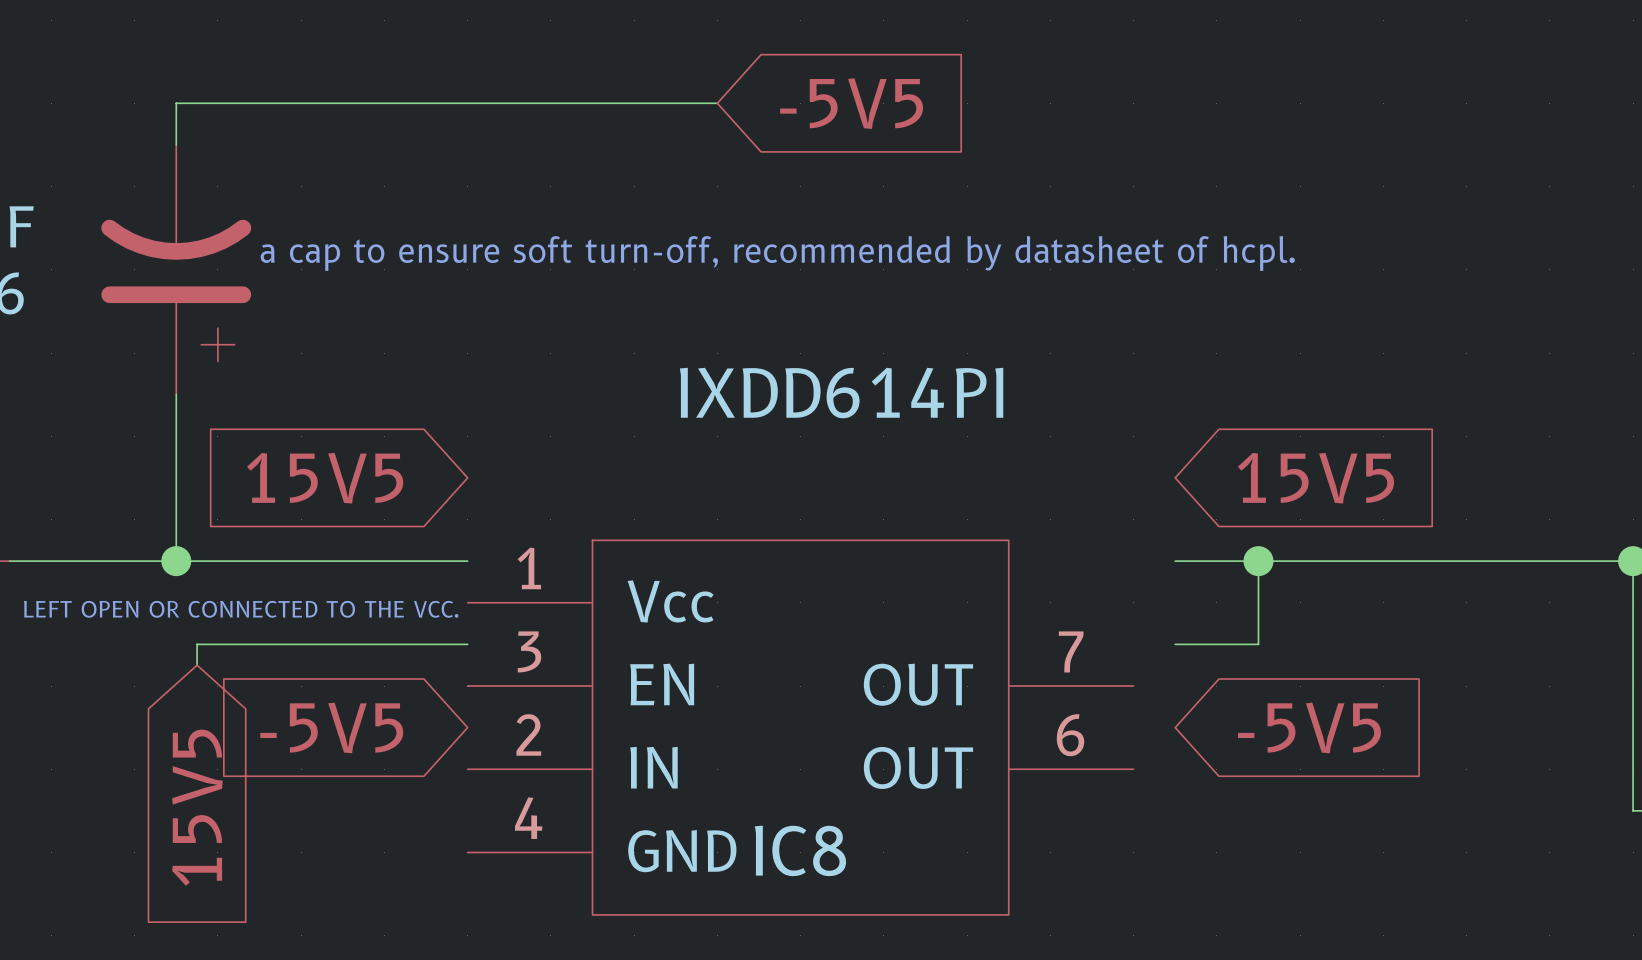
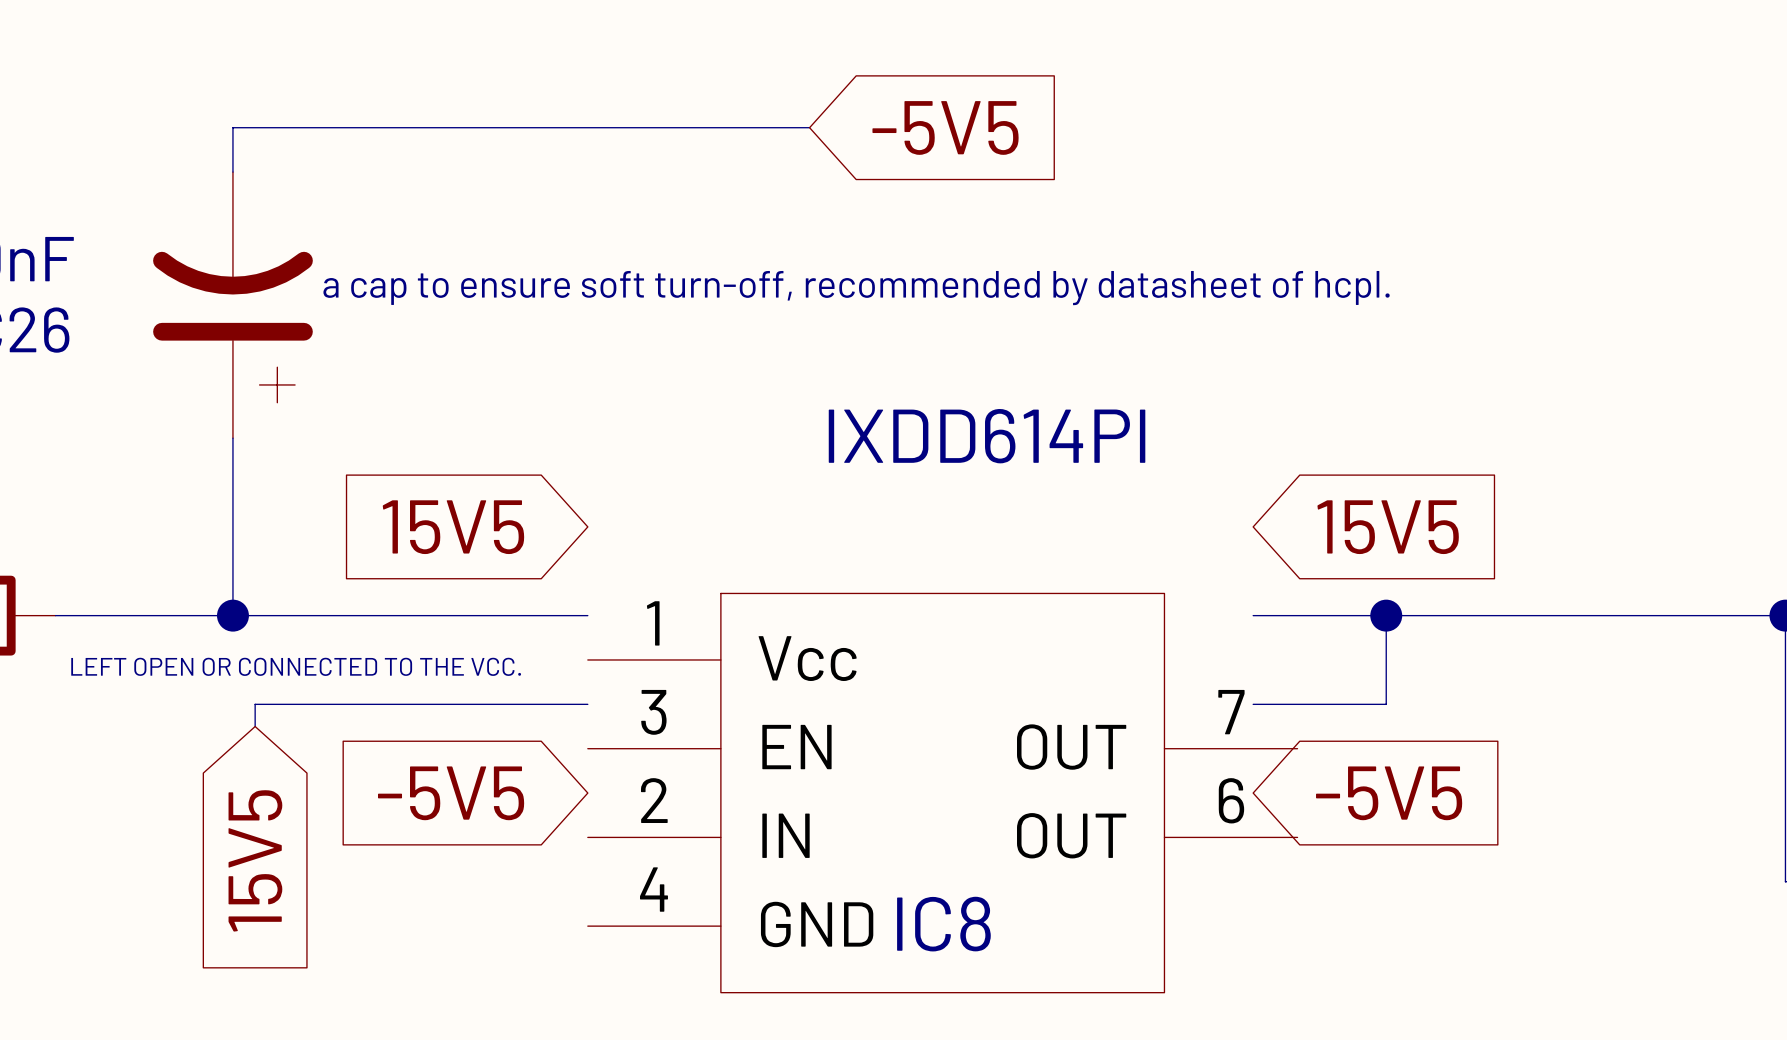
global label position: 15V5 (325, 478) -> 15V5 (453, 527)
global label position: 15V5 (1315, 478) -> 15V5 (1388, 527)
wire: none -> (543, 615) (587, 615)
wire: none -> (1253, 615) (1297, 615)
wire: none -> (543, 704) (587, 704)
wire: none -> (1253, 704) (1297, 704)
global label position: -5V5 (331, 727) -> -5V5 (451, 793)
IC8 position: (800, 727) -> (942, 793)
global label position: -5V5 (1309, 727) -> -5V5 (1389, 793)

